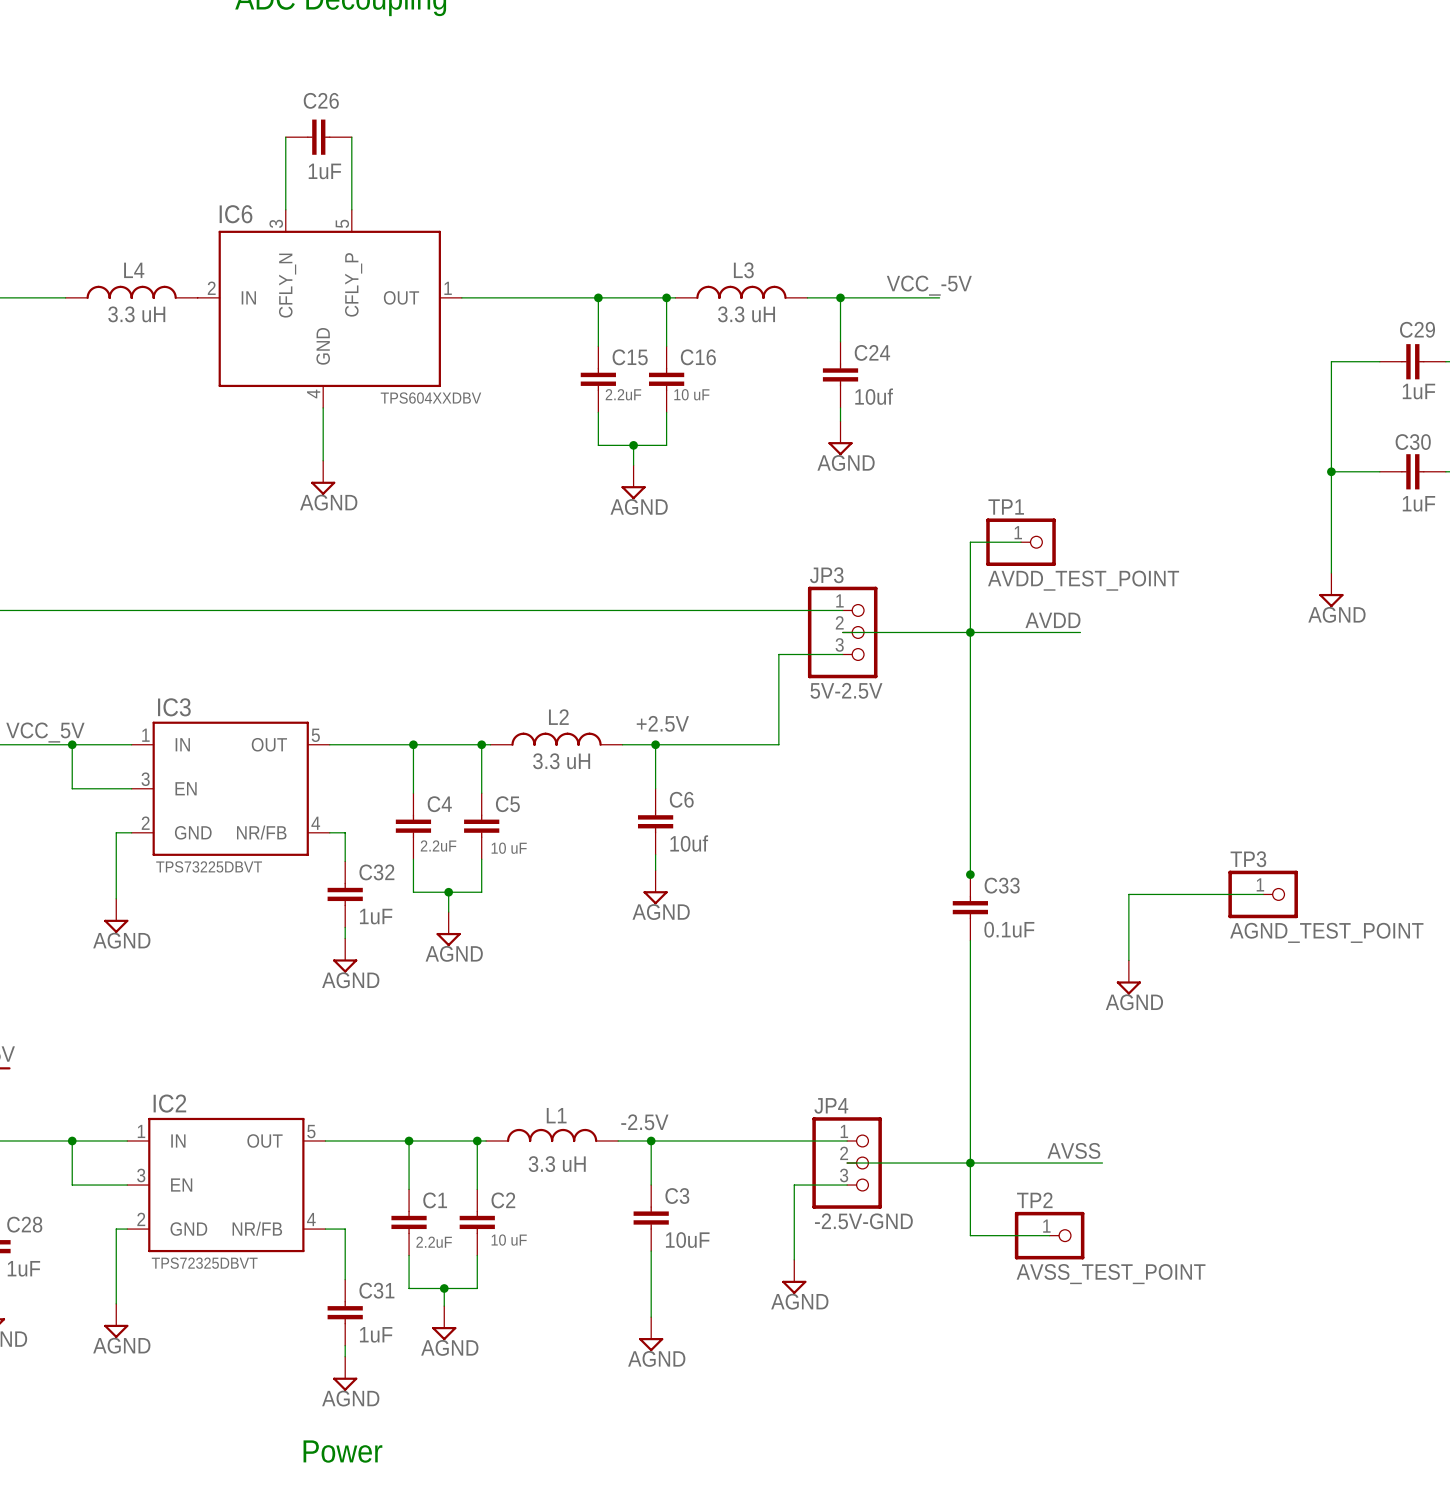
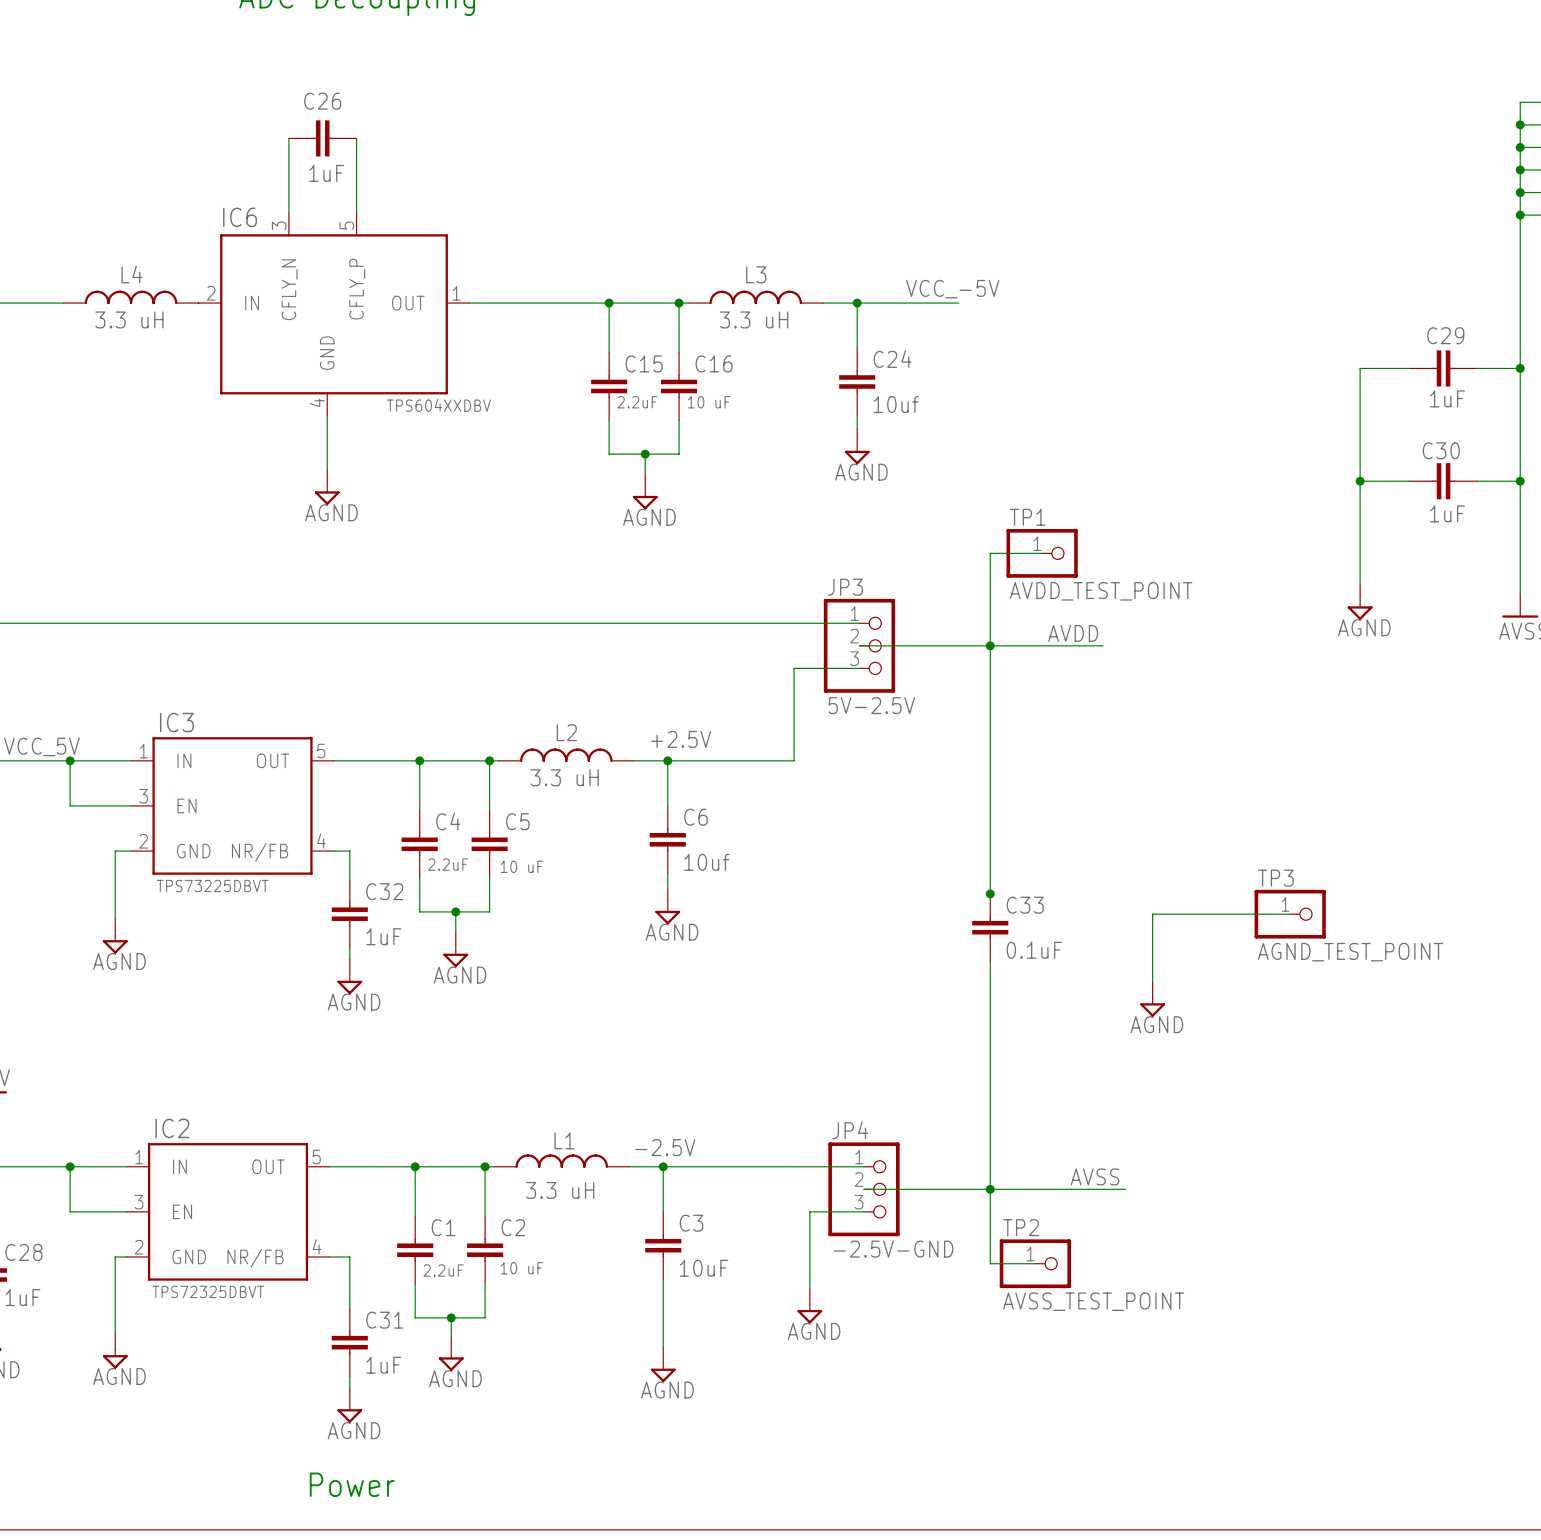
wire: (1014, 1235) (1049, 1235) -> none
TP2 position: (1049, 1235) -> (1035, 1263)

